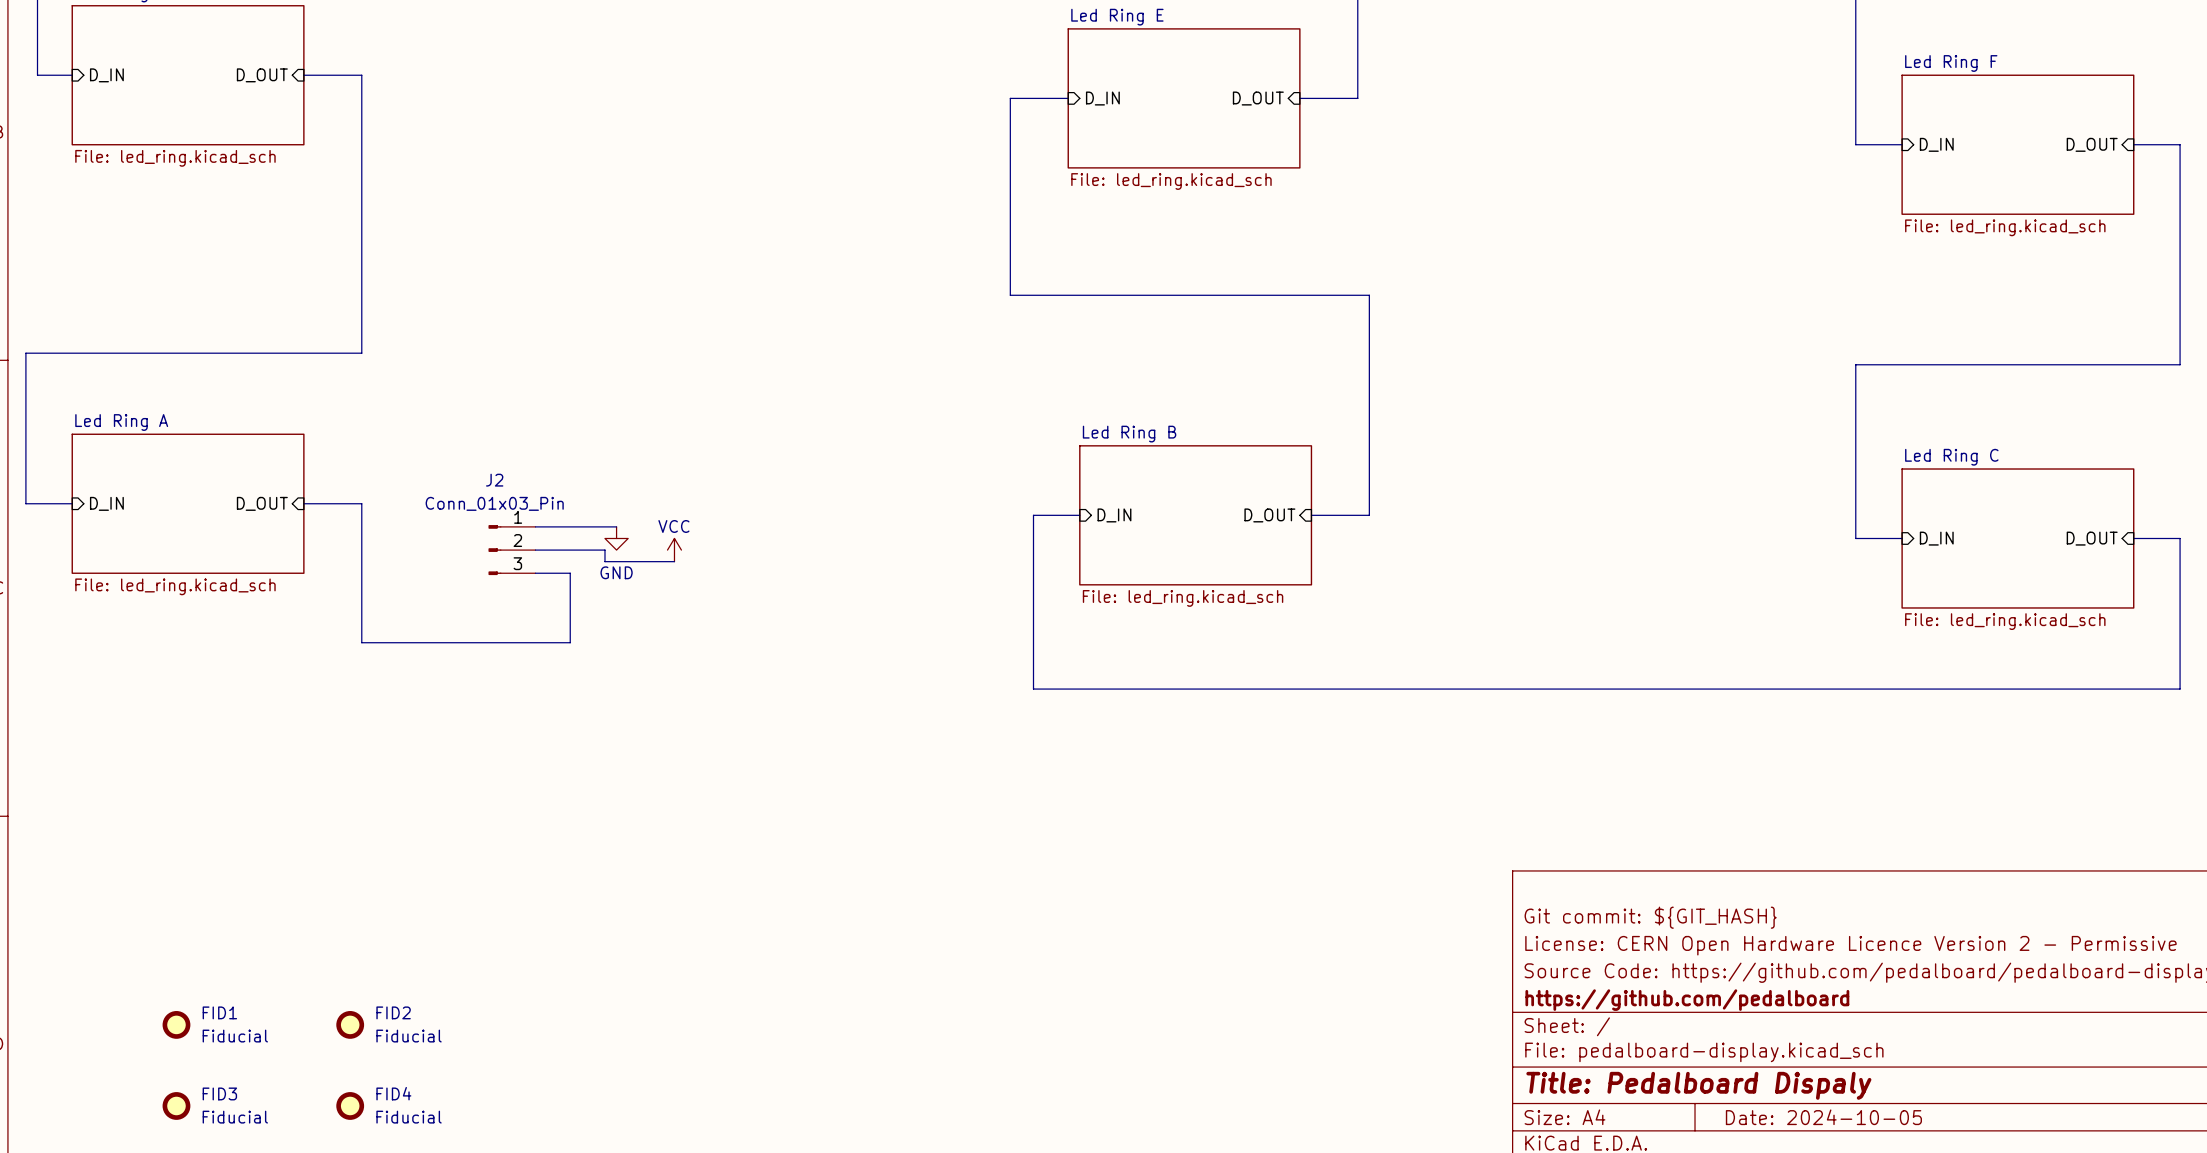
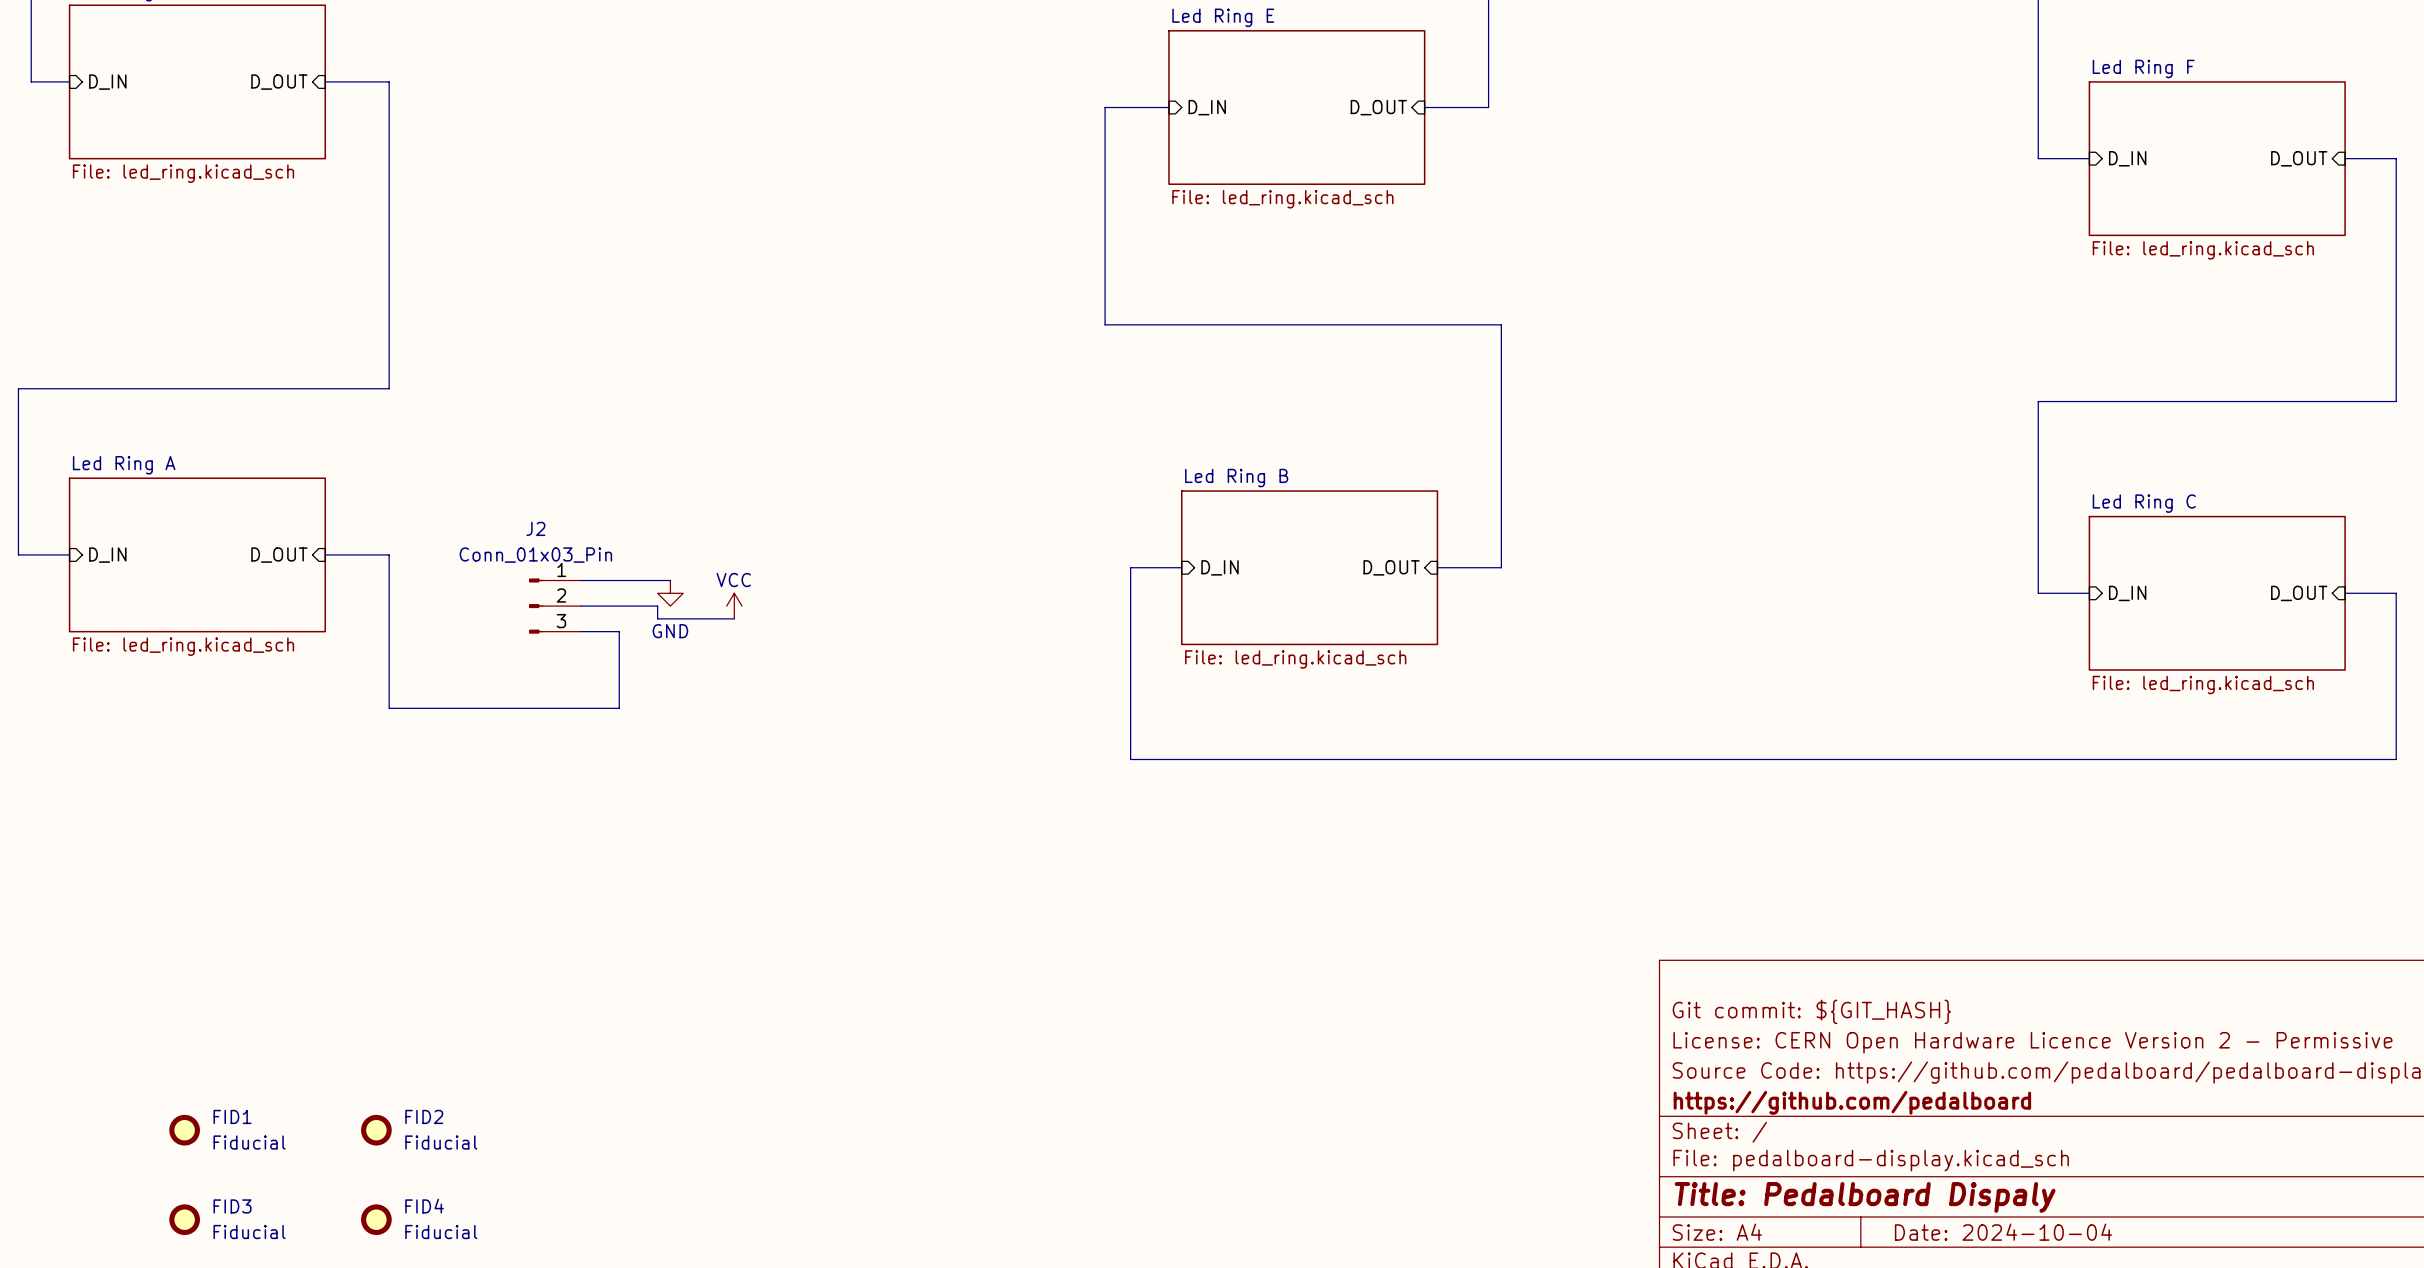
title block: Date: 2024-10-05 (1823, 1117) -> Date: 2024-10-04 (2003, 1232)

